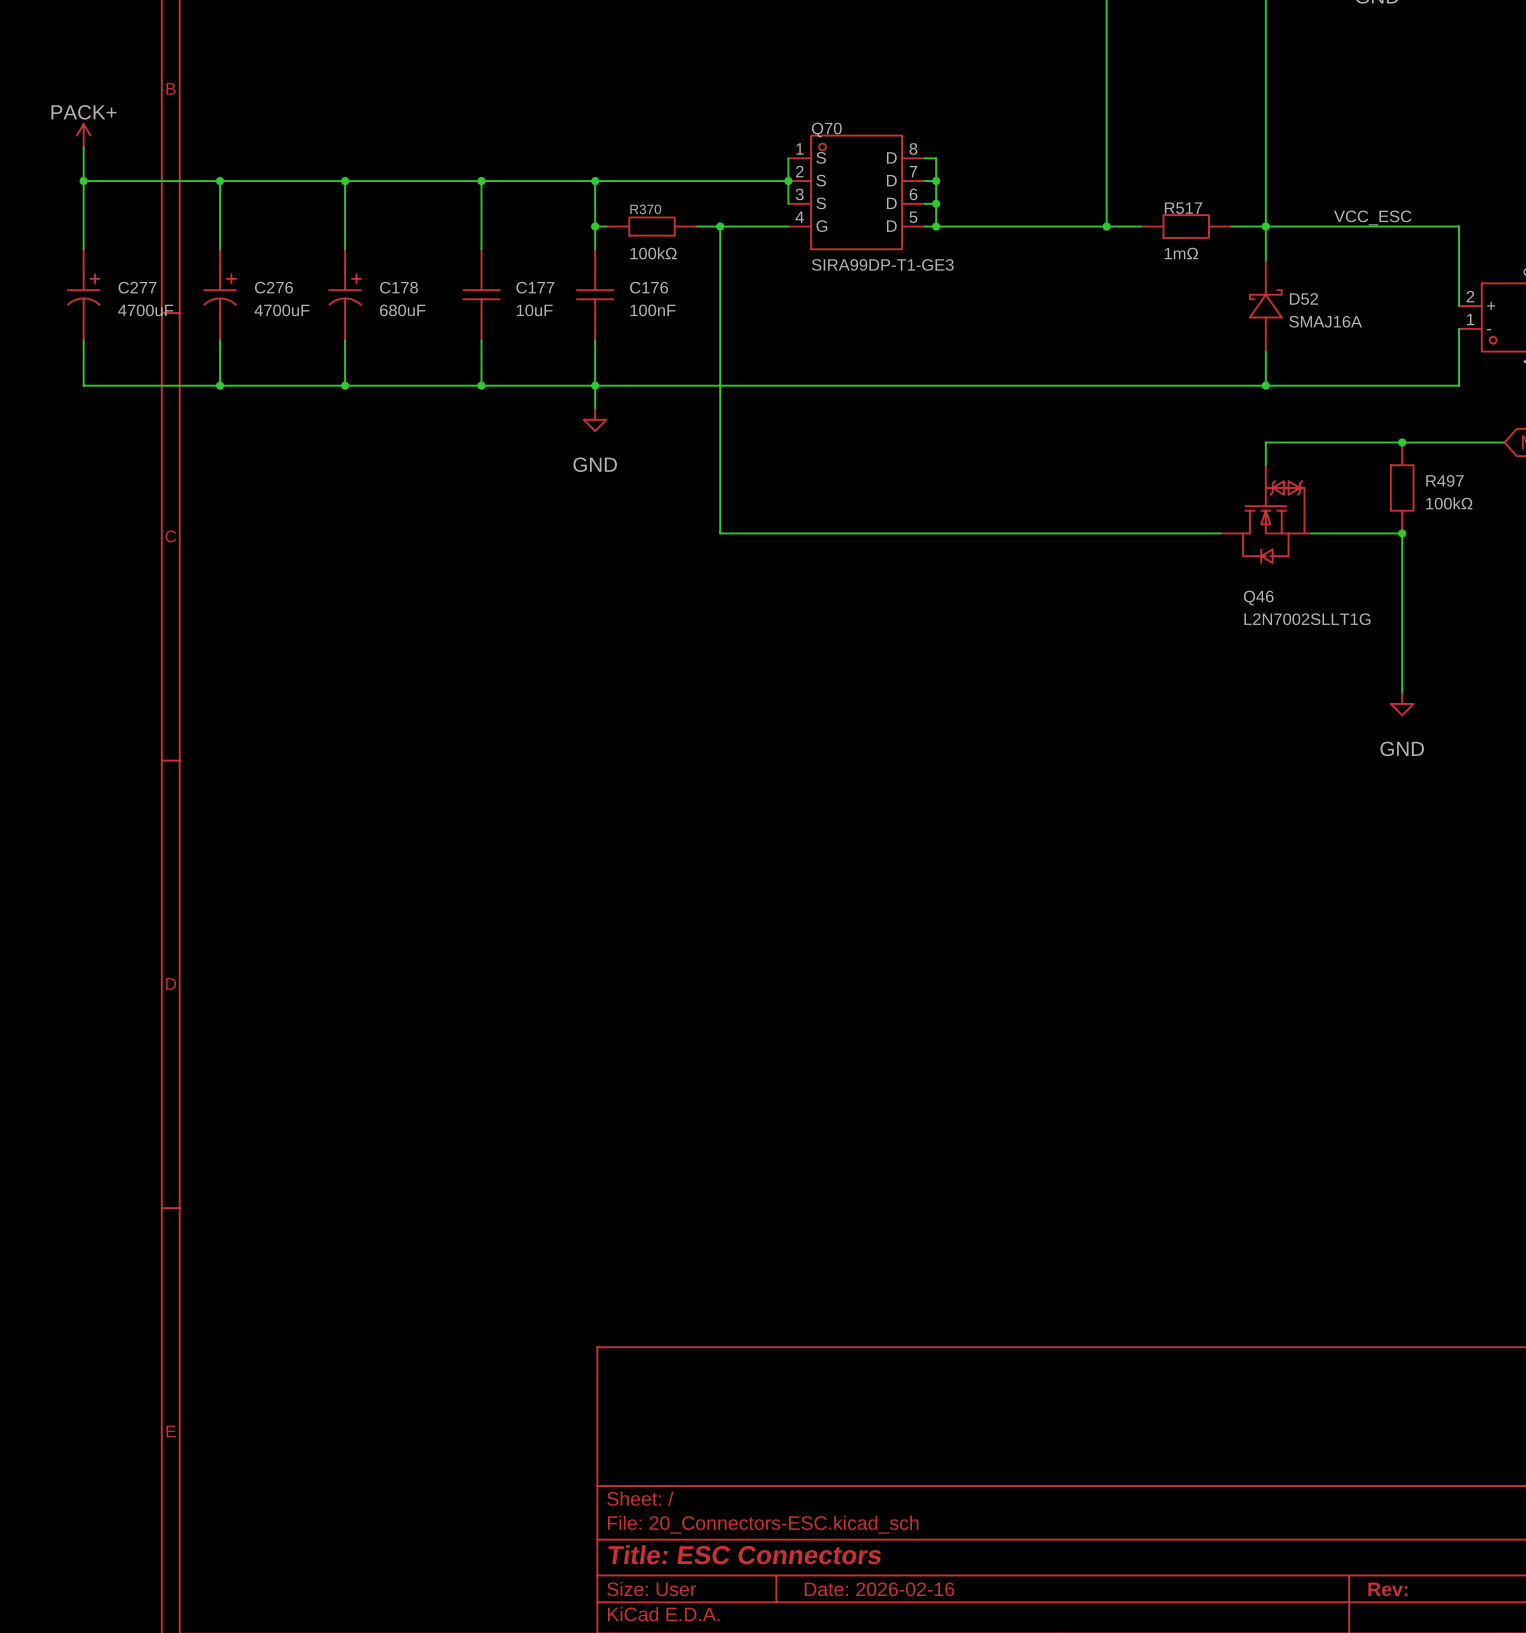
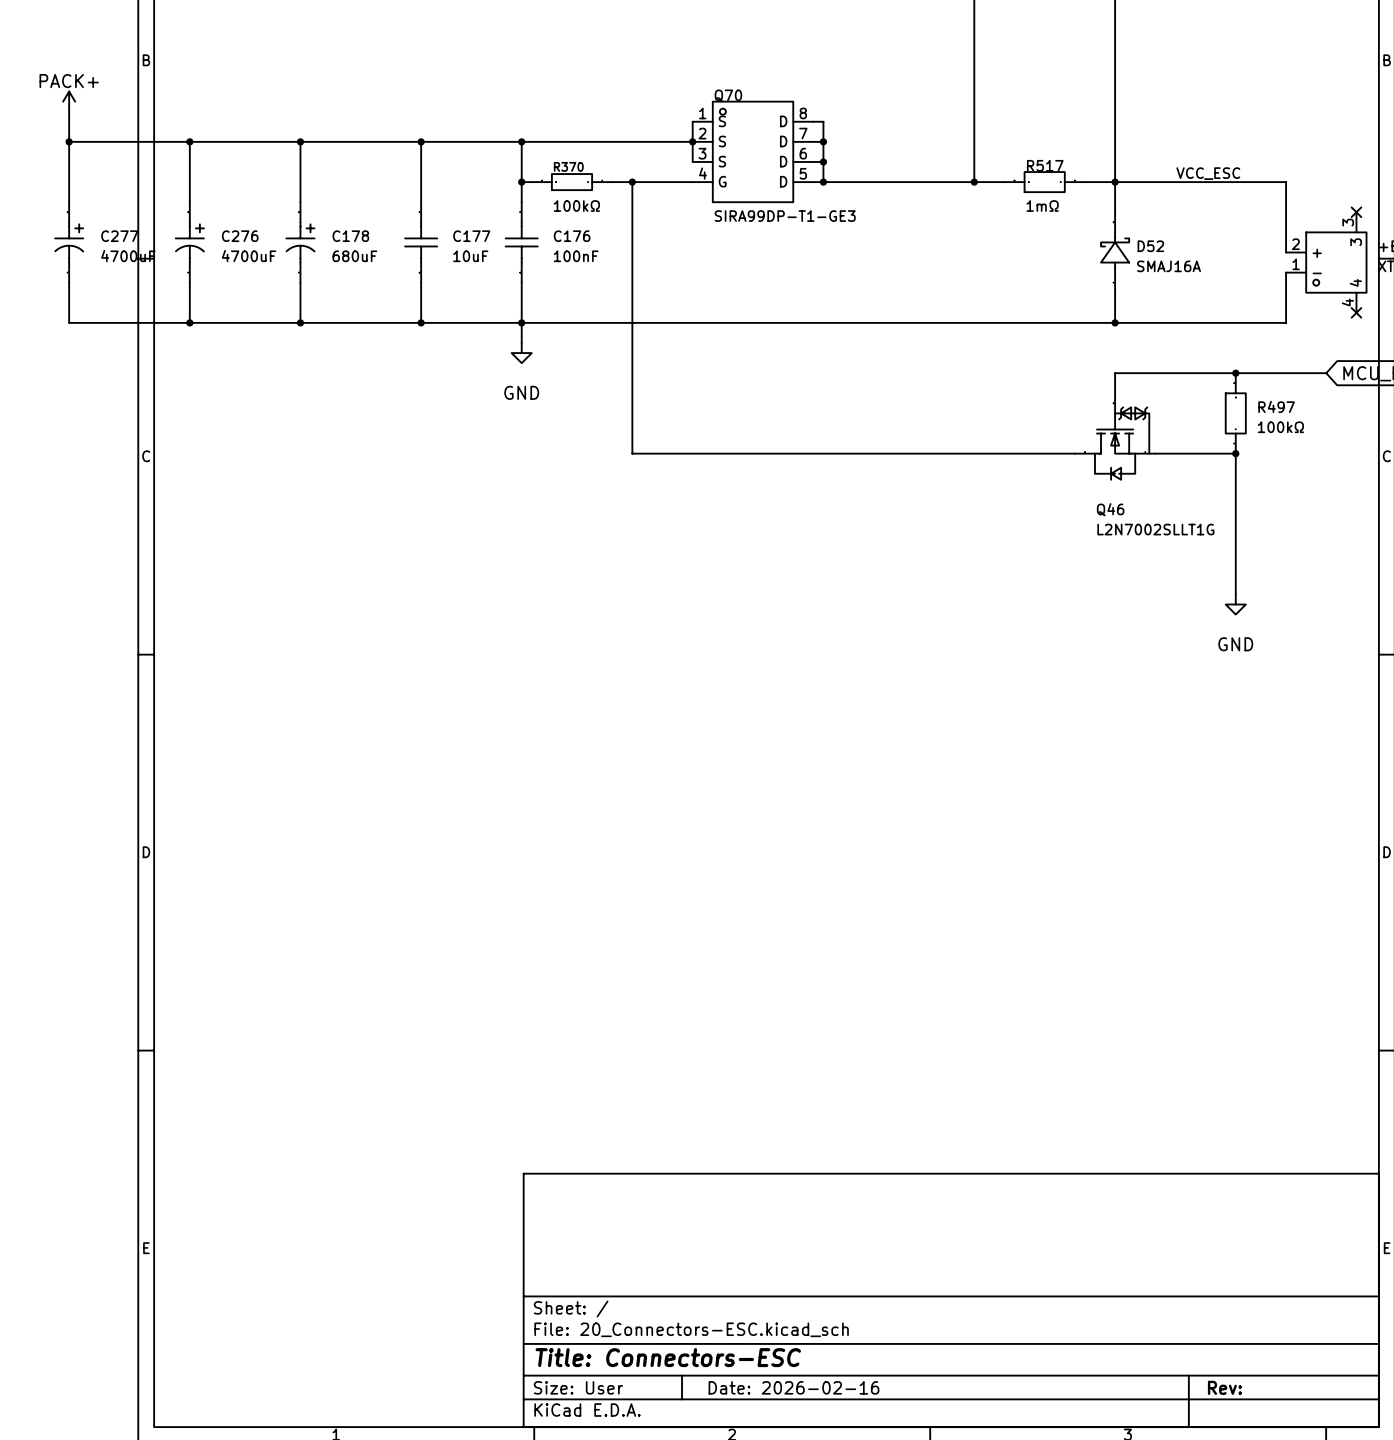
title block: Title: ESC Connectors (744, 1554) -> Title: Connectors-ESC (668, 1357)

